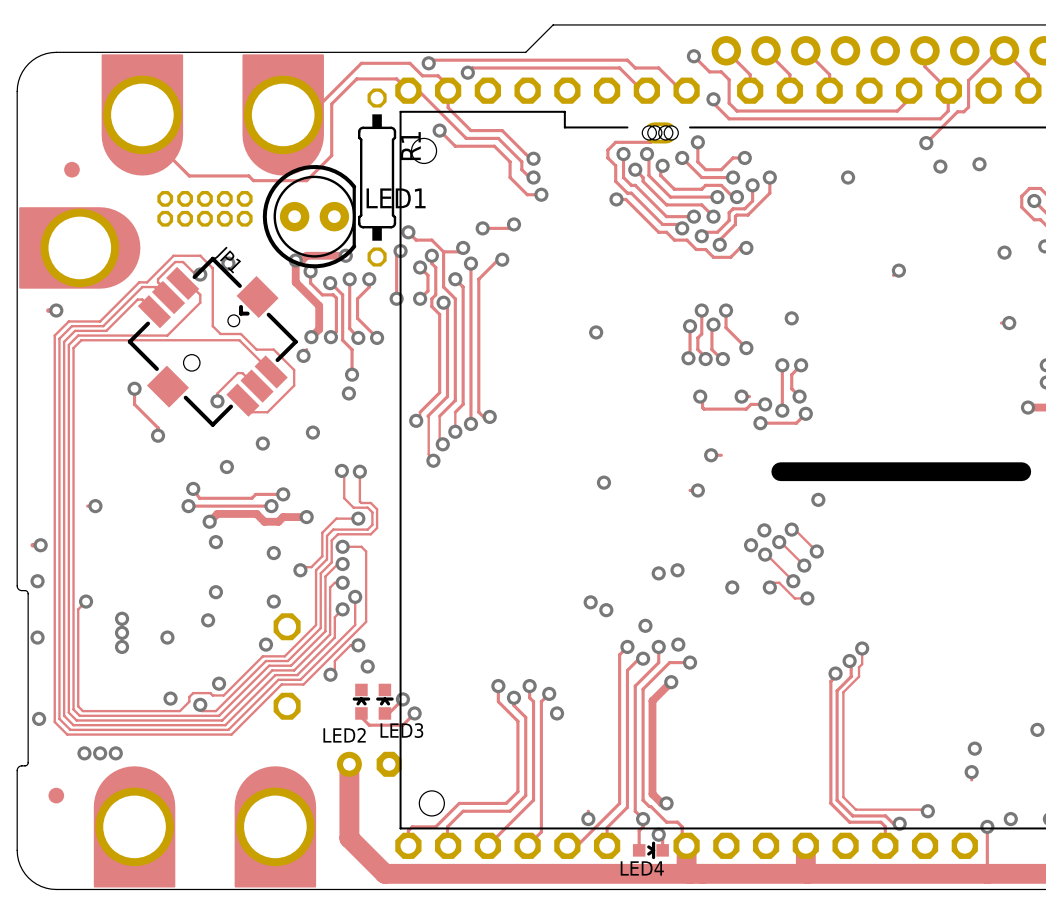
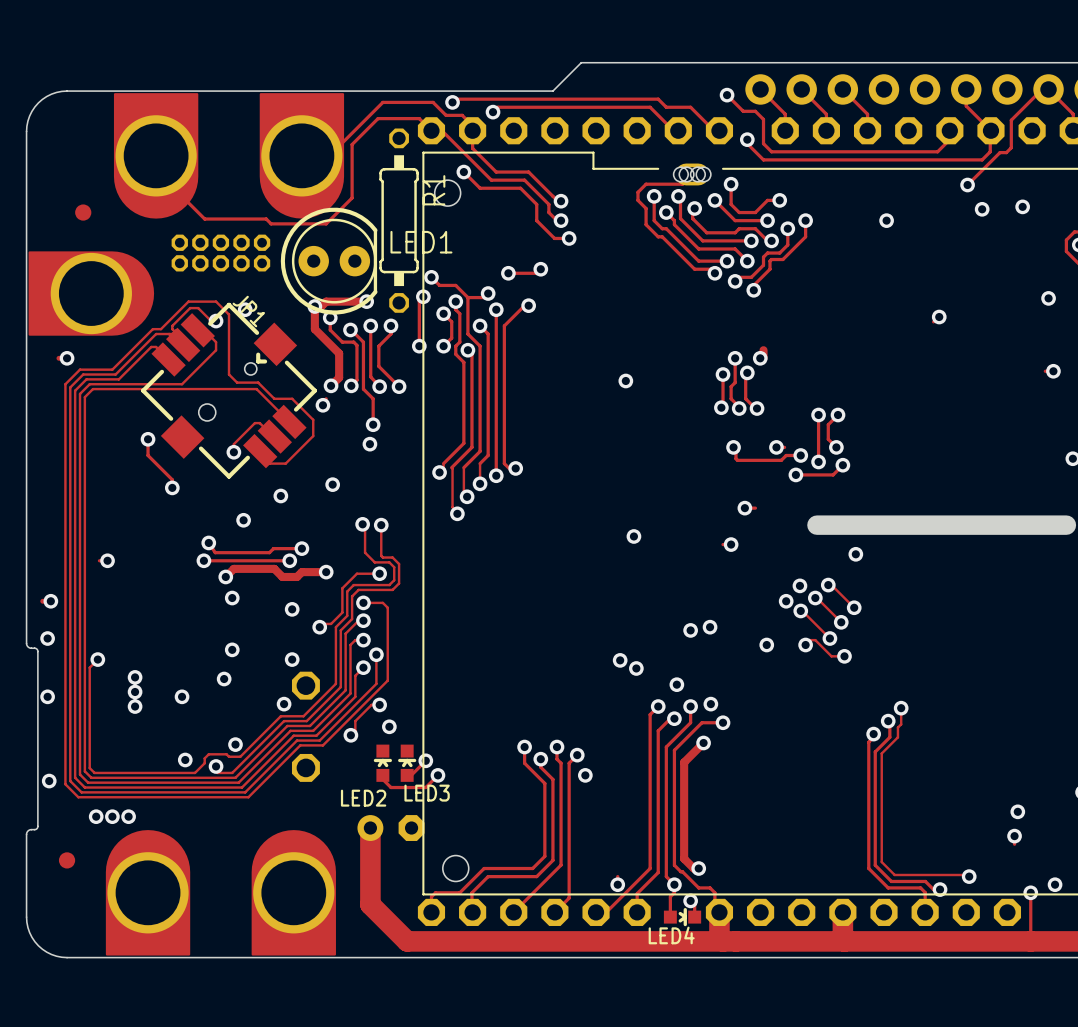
track: (616, 199) (625, 199) (658, 232) (666, 232) (674, 240) (686, 240) (696, 249) (705, 249) (713, 257) (730, 257) (740, 247) (746, 247) -> none
via: (616, 199) -> none
via: (746, 247) -> none
track: none -> (763, 350) (763, 358)
track: (726, 310) (726, 327) (746, 348) -> none
via: (791, 318) -> none
via: (746, 348) -> none

